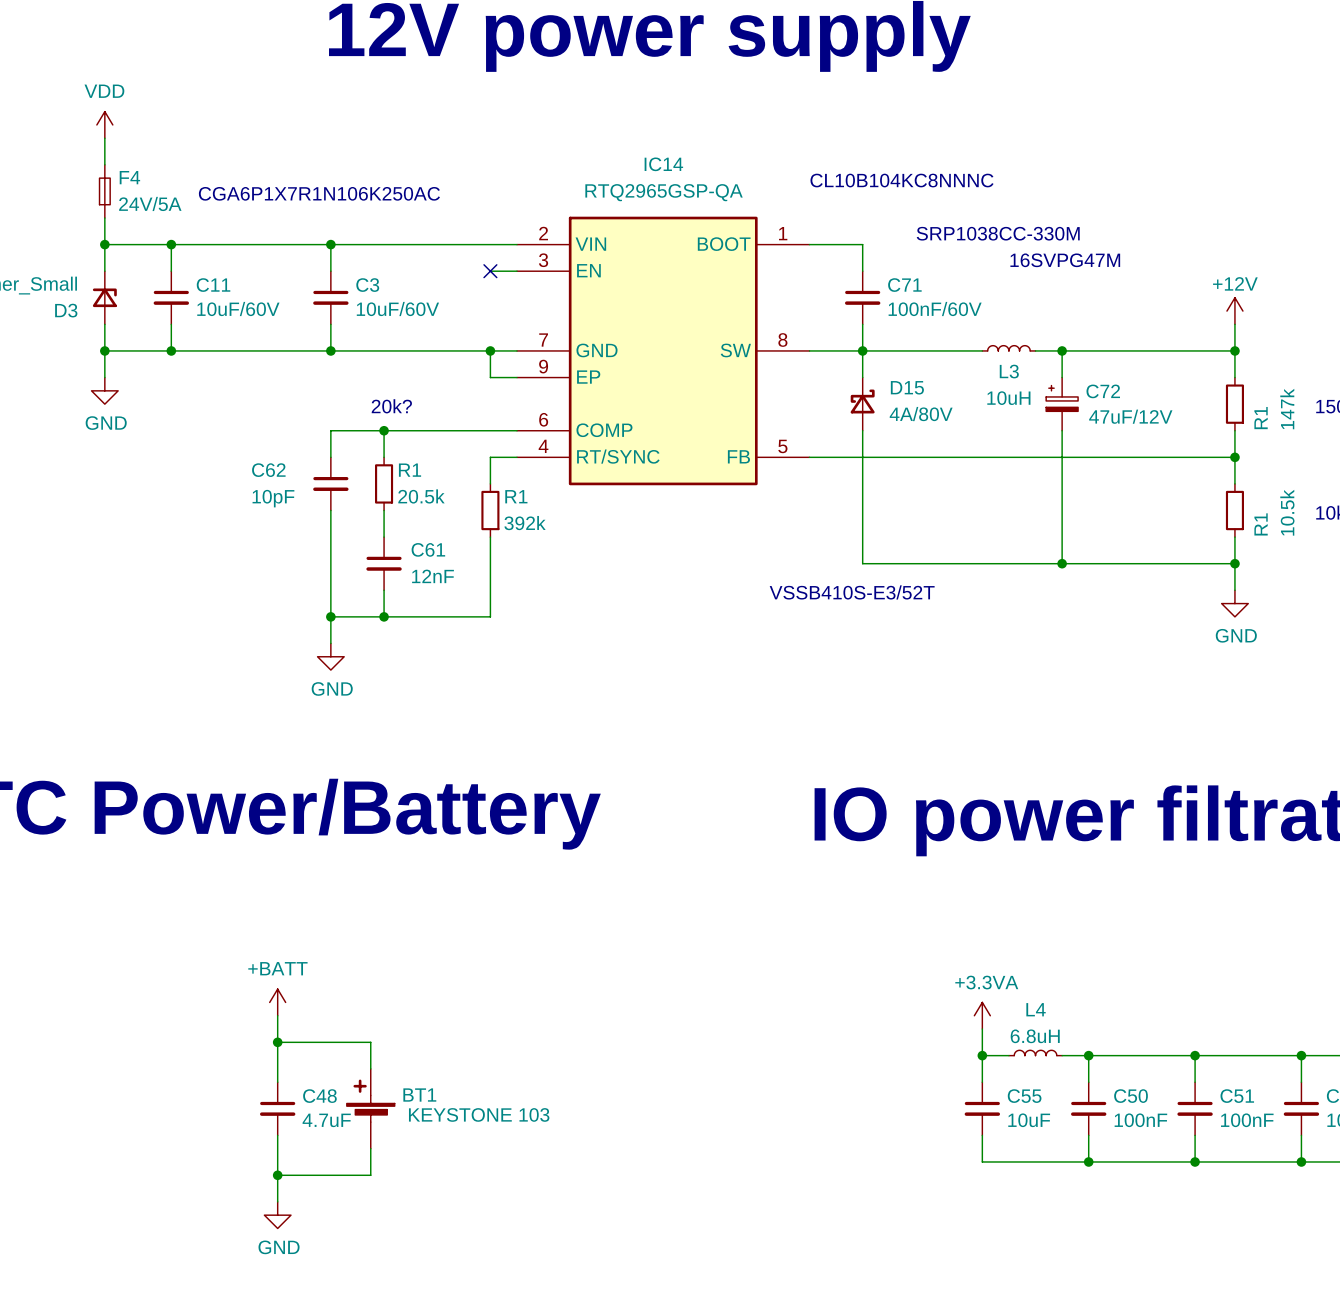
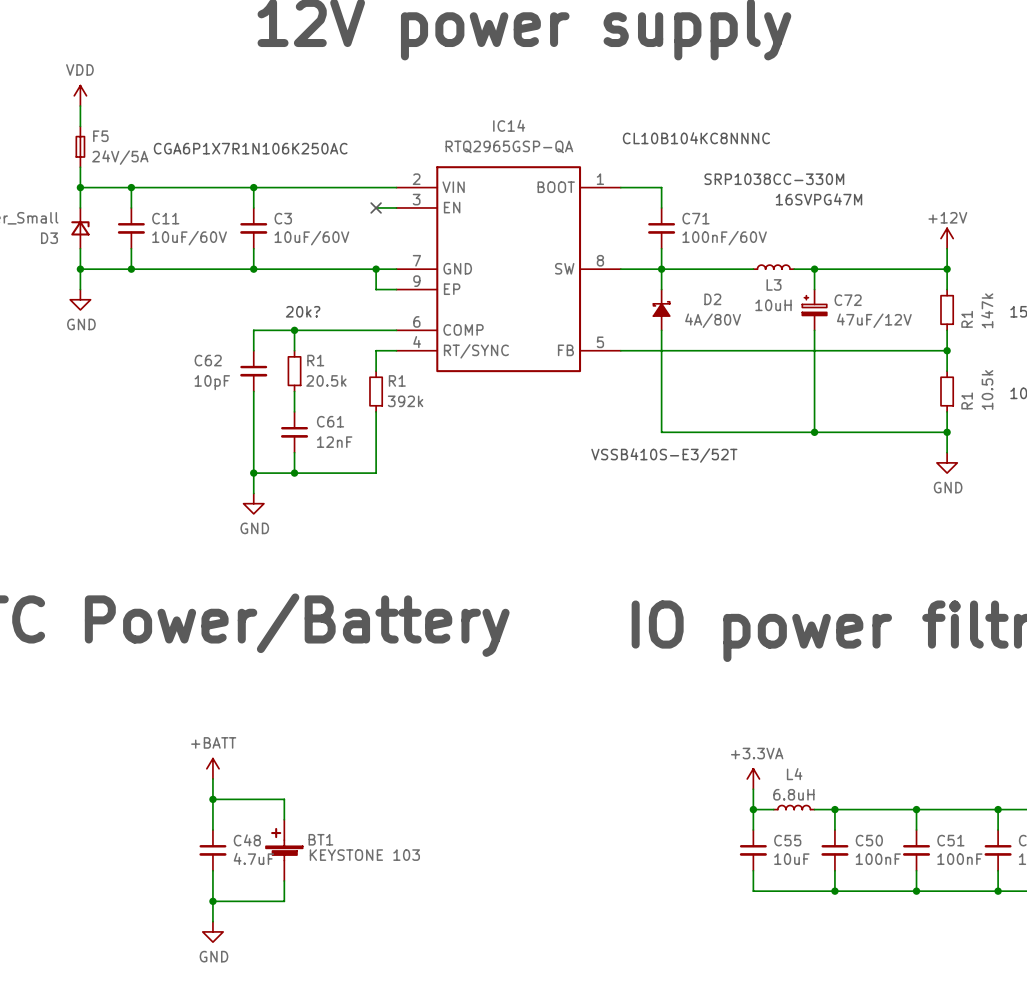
F4 name: F4 (129, 177) -> F5 (100, 136)
D15: 4A/80V (862, 404) -> none
D2: none -> 4A/80V (661, 309)

